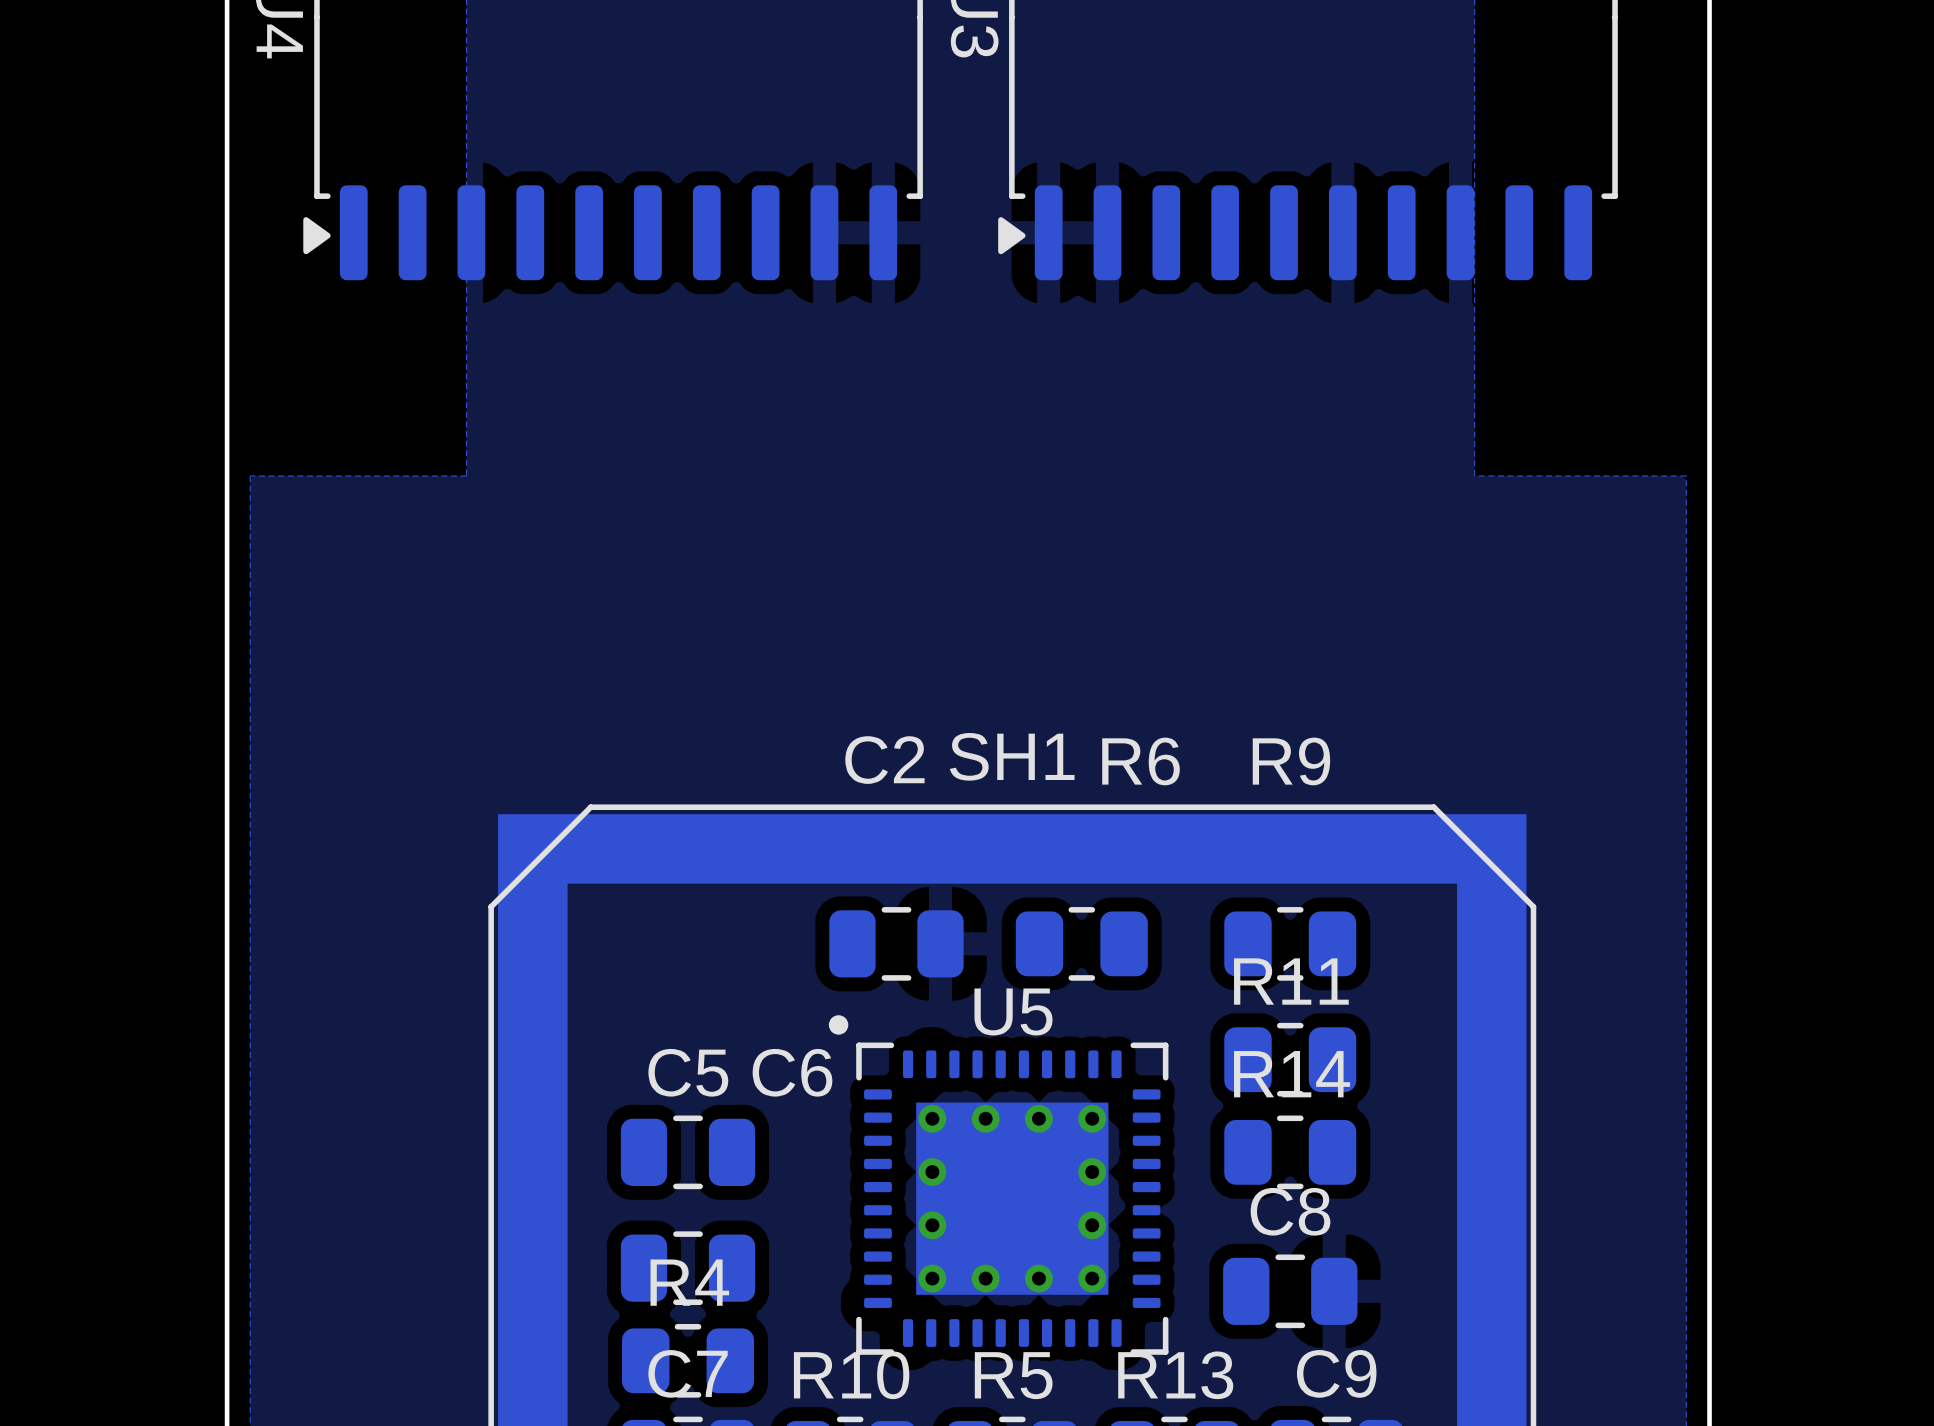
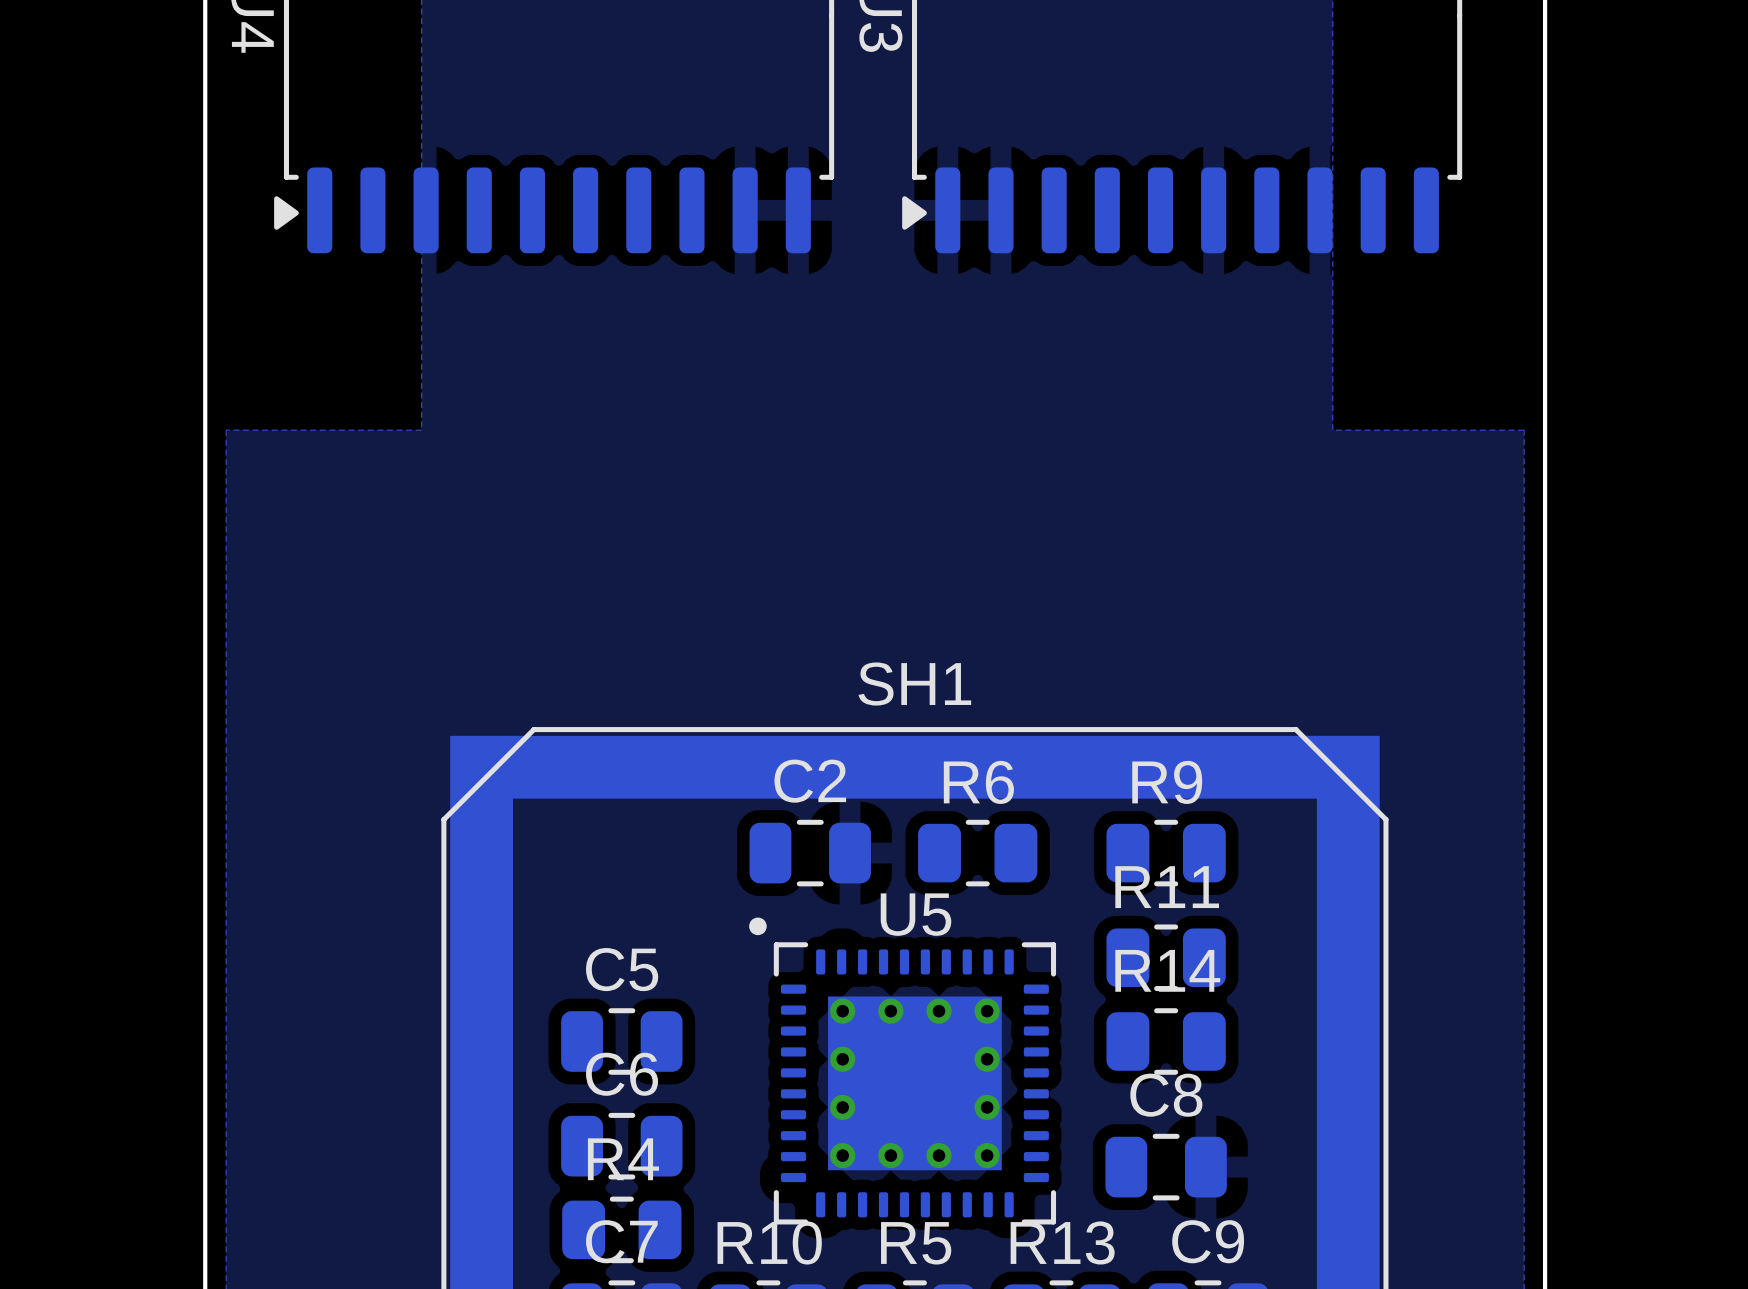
C2 name position: C2 (884, 760) -> C2 (810, 781)
R6 name position: R6 (1140, 761) -> R6 (978, 782)
R9 name position: R9 (1291, 761) -> R9 (1167, 782)
C6 name position: C6 (792, 1072) -> C6 (622, 1074)

